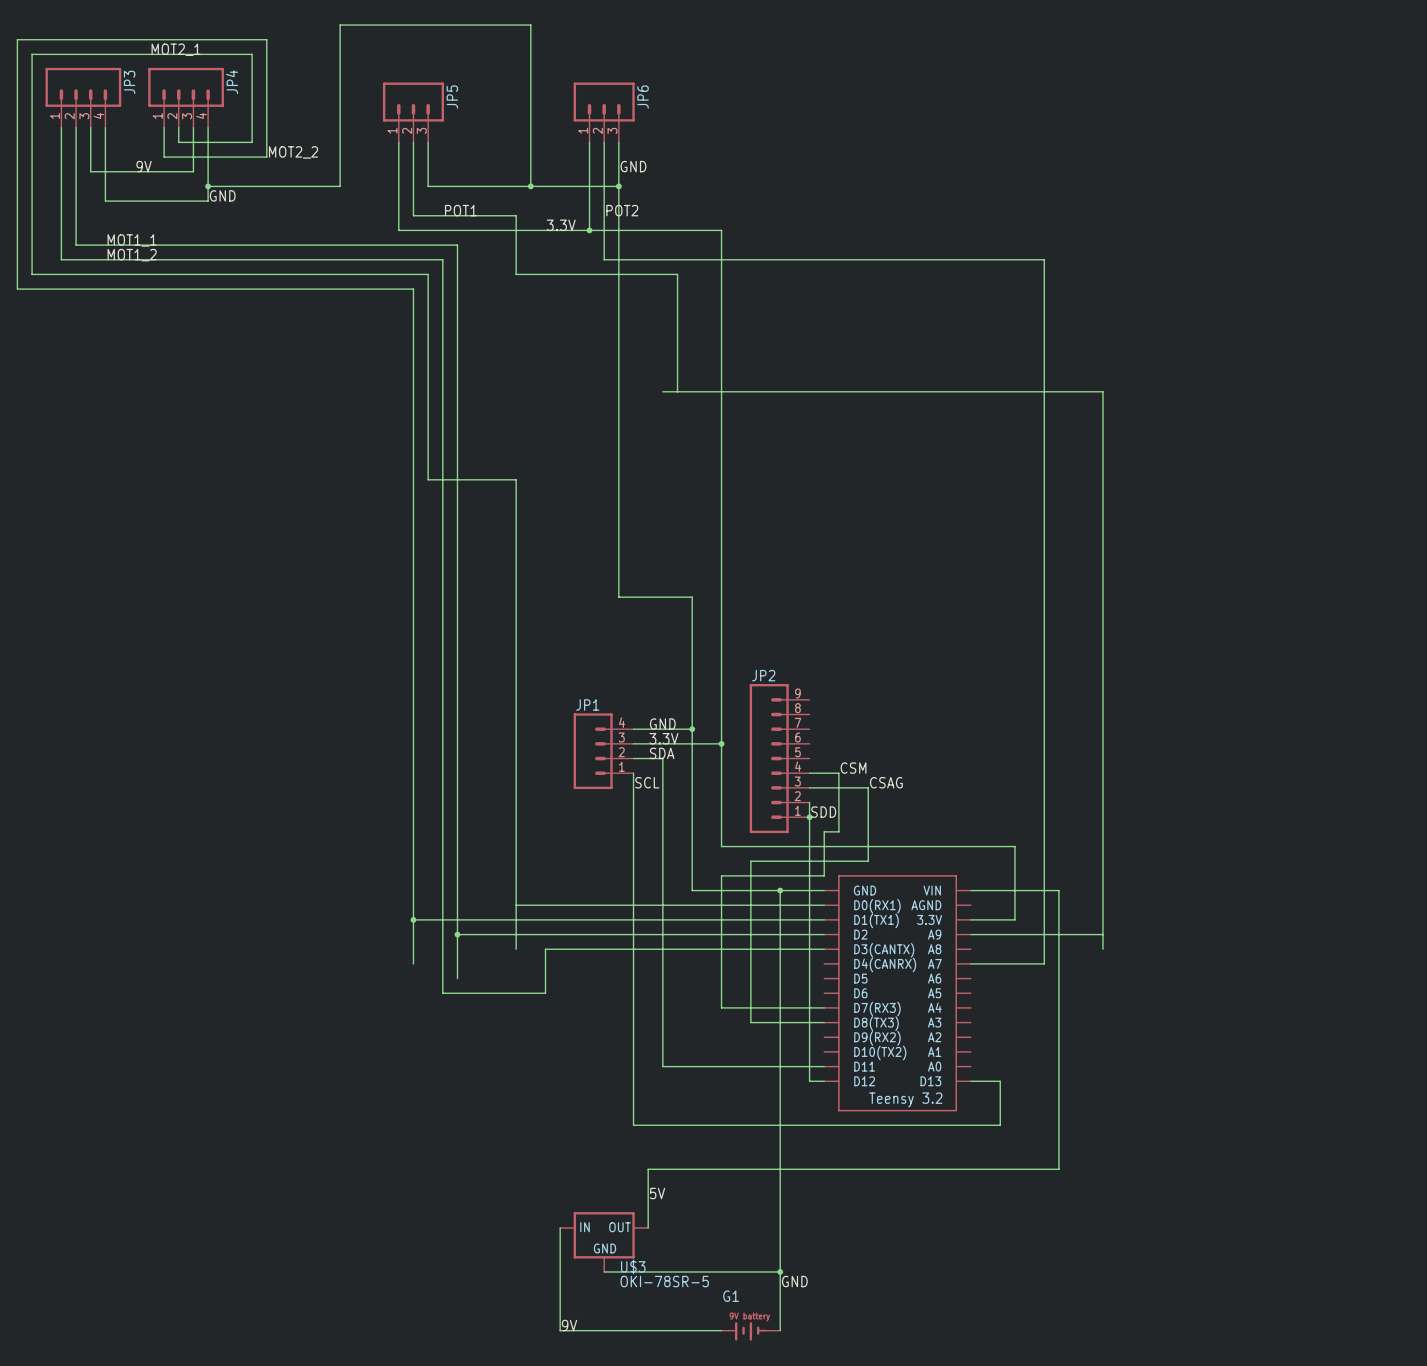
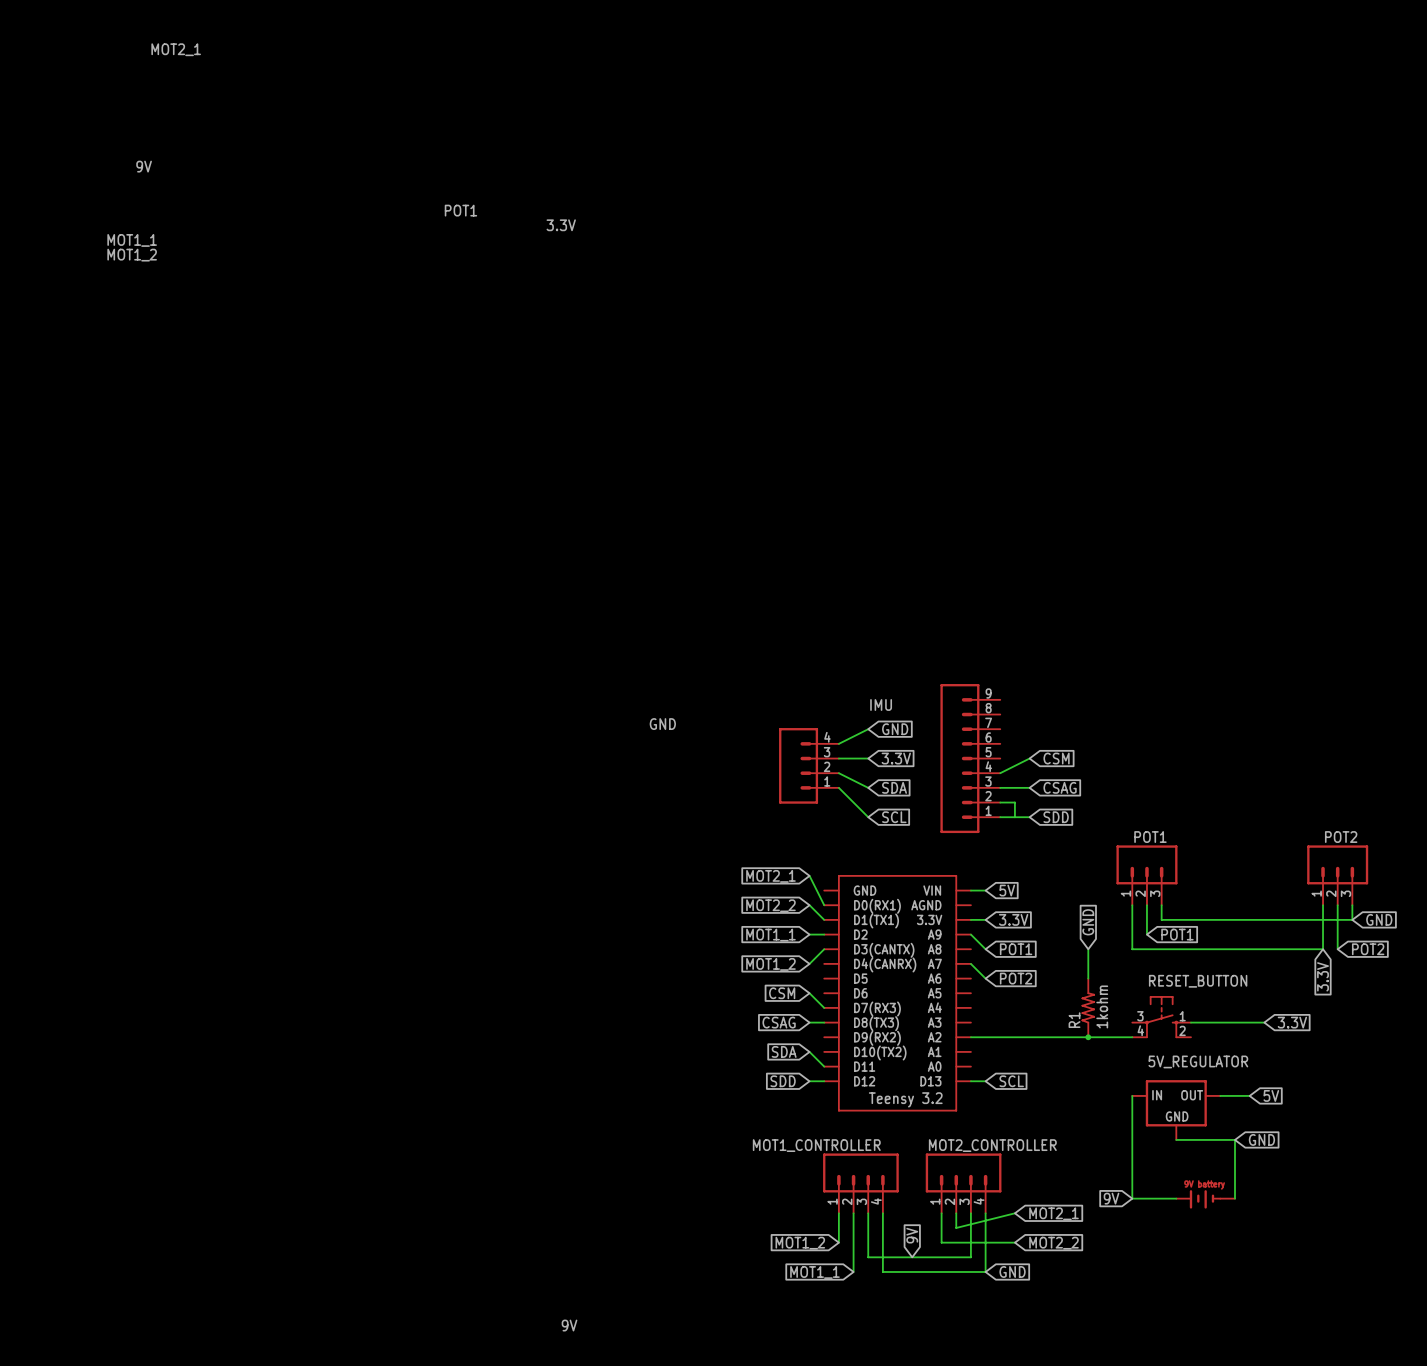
JP3: (83, 97) -> none
JP4: (186, 97) -> none
JP5: (413, 112) -> none
JP6: (604, 112) -> none
wire: (61, 127) (61, 259) (442, 259) (442, 993) (545, 993) (545, 949) (824, 949) -> (809, 963) (824, 949)
wire: (76, 127) (76, 245) (457, 245) (457, 978) -> none
wire: (90, 127) (90, 171) (193, 171) (193, 127) -> none
wire: (105, 127) (105, 201) (208, 201) (208, 127) -> none
wire: (164, 127) (164, 157) (266, 157) (266, 39) (17, 39) (17, 289) (413, 289) (413, 963) -> none
wire: (178, 127) (178, 142) (252, 142) (252, 54) (32, 54) (32, 274) (428, 274) (428, 479) (516, 479) (516, 949) -> none
wire: (398, 142) (398, 230) (721, 230) (721, 846) (1014, 846) (1014, 919) (985, 919) -> none
wire: (413, 142) (413, 215) (516, 215) (516, 274) (677, 274) (677, 391) -> none
wire: (428, 142) (428, 186) (618, 186) -> none
wire: (589, 142) (589, 230) -> none
wire: (604, 142) (604, 259) (1044, 259) (1044, 963) (970, 963) -> (985, 978) (970, 963)
wire: (618, 142) (618, 597) (692, 597) (692, 890) (824, 890) -> none
label: MOT2_2 (293, 152) -> none
label: GND (633, 166) -> none
wire: (208, 186) (340, 186) (340, 25) (530, 25) (530, 186) -> none
junction: (208, 186) -> none
junction: (530, 186) -> none
junction: (618, 186) -> none
label: GND (222, 195) -> none
label: POT2 (622, 210) -> none
junction: (589, 230) -> none
wire: (662, 391) (1102, 391) (1102, 949) -> none
wire: (633, 729) (692, 729) -> none
junction: (692, 729) -> none
wire: none -> (868, 729) (838, 743)
global label: none -> GND (895, 729)
label: 3.3V (663, 738) -> none
wire: (633, 743) (721, 743) -> none
junction: (721, 743) -> none
JP1: (603, 751) -> none
label: SDA (662, 753) -> none
wire: (633, 758) (662, 758) (662, 1066) (824, 1066) -> (809, 1051) (824, 1066)
JP2: (779, 758) -> none
wire: none -> (838, 758) (868, 758)
global label: none -> 3.3V (896, 758)
IMU: none -> (970, 758)
wire: none -> (1029, 758) (1000, 773)
global label: none -> CSM (1056, 758)
part: none -> (808, 765)
label: CSM (853, 768) -> none
wire: (633, 773) (633, 1125) (1000, 1125) (1000, 1081) (985, 1081) -> none
wire: (809, 773) (838, 773) (838, 831) (824, 831) (824, 875) (721, 875) (721, 1007) (824, 1007) -> (809, 993) (824, 1007)
wire: none -> (838, 773) (868, 787)
label: SCL (647, 782) -> none
label: CSAG (886, 782) -> none
wire: (809, 787) (868, 787) (868, 861) (750, 861) (750, 1022) (809, 1022) -> none
wire: none -> (838, 787) (868, 817)
global label: none -> SDA (894, 787)
wire: none -> (1000, 787) (1029, 787)
global label: none -> CSAG (1060, 787)
wire: (809, 802) (809, 1081) -> none
wire: none -> (1000, 802) (1014, 802) (1014, 817)
label: SDD (823, 812) -> none
junction: (809, 817) -> none
global label: none -> SCL (894, 817)
wire: none -> (1000, 817) (1029, 817)
global label: none -> SDD (1056, 817)
POT1: none -> (1146, 875)
POT2: none -> (1337, 875)
global label: none -> MOT2_1 (770, 876)
wire: (780, 890) (780, 1330) -> none
junction: (780, 890) -> none
wire: (985, 890) (1058, 890) (1058, 1169) (648, 1169) (648, 1227) -> none
global label: none -> 5V (1007, 890)
wire: (516, 905) (824, 905) -> (809, 875) (824, 905)
global label: none -> MOT2_2 (770, 905)
wire: none -> (1132, 905) (1132, 949) (1323, 949) (1323, 905)
wire: none -> (1146, 905) (1146, 934)
wire: none -> (1161, 905) (1161, 919) (1352, 919) (1352, 905)
wire: none -> (1337, 905) (1337, 949)
wire: (413, 919) (824, 919) -> (809, 905) (824, 919)
junction: (413, 919) -> none
global label: none -> 3.3V (1013, 919)
global label: none -> GND (1379, 919)
global label: none -> GND (1088, 922)
wire: (457, 934) (809, 934) -> none
junction: (457, 934) -> none
wire: (970, 934) (1102, 934) -> (970, 934) (985, 949)
global label: none -> POT1 (1177, 934)
global label: none -> MOT1_1 (770, 935)
global label: none -> POT1 (1016, 949)
wire: none -> (1088, 949) (1088, 978)
global label: none -> POT2 (1368, 949)
global label: none -> MOT1_2 (770, 964)
global label: none -> 3.3V (1323, 976)
global label: none -> POT2 (1016, 978)
global label: none -> CSM (782, 993)
R1: none -> 1kohm (1088, 1007)
RESET_BUTTON: none -> (1161, 1016)
global label: none -> CSAG (779, 1022)
wire: none -> (1190, 1022) (1264, 1022)
global label: none -> 3.3V (1292, 1022)
wire: none -> (970, 1037) (1132, 1037)
junction: none -> (1088, 1037)
global label: none -> SDA (784, 1051)
global label: none -> SDD (783, 1081)
global label: none -> SCL (1011, 1081)
wire: none -> (1132, 1095) (1132, 1198) (1176, 1198)
wire: none -> (1220, 1095) (1249, 1095)
global label: none -> 5V (1271, 1095)
5V_REGULATOR: none -> (1176, 1110)
wire: none -> (1176, 1139) (1234, 1139) (1234, 1198)
global label: none -> GND (1261, 1139)
MOT1_CONTROLLER: none -> (860, 1183)
MOT2_CONTROLLER: none -> (963, 1183)
label: 5V (657, 1193) -> none
global label: none -> 9V (1111, 1198)
part: none -> (1205, 1199)
wire: none -> (838, 1213) (838, 1242)
wire: none -> (853, 1213) (853, 1271)
wire: none -> (868, 1213) (868, 1257) (970, 1257) (970, 1213)
wire: none -> (882, 1213) (882, 1271) (985, 1271) (985, 1213)
wire: none -> (941, 1213) (941, 1242) (1014, 1242)
wire: none -> (956, 1213) (956, 1227) (1014, 1213)
global label: none -> MOT2_1 (1053, 1213)
wire: (560, 1227) (560, 1330) (721, 1330) -> none
global label: none -> 9V (912, 1235)
U$3: OKI-78SR-5 (604, 1242) -> none
global label: none -> MOT1_2 (800, 1243)
global label: none -> MOT2_2 (1053, 1243)
wire: (604, 1271) (780, 1271) -> none
junction: (780, 1271) -> none
global label: none -> GND (1012, 1271)
global label: none -> MOT1_1 (814, 1272)
label: GND (794, 1281) -> none
G1: (750, 1331) -> none

